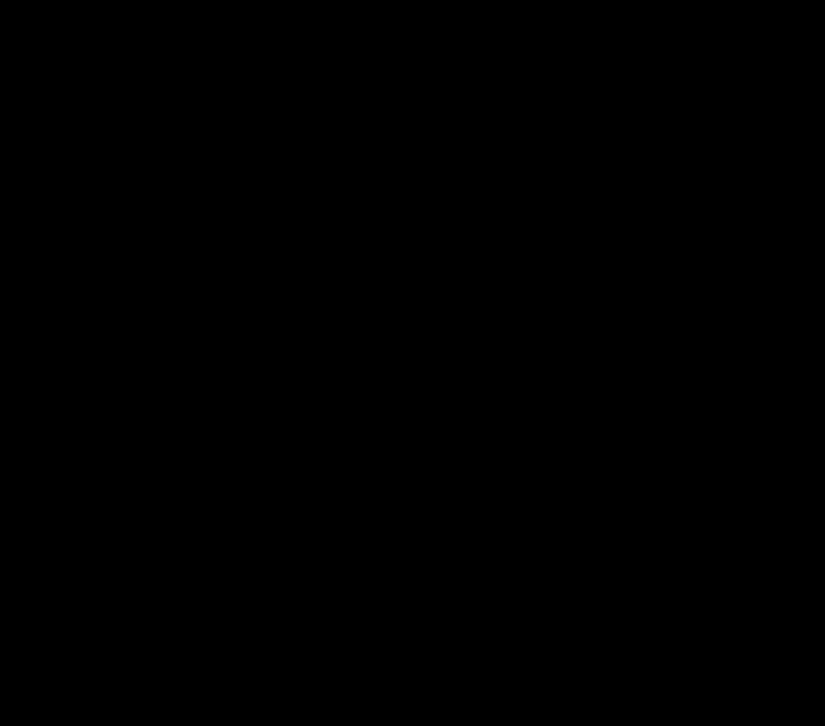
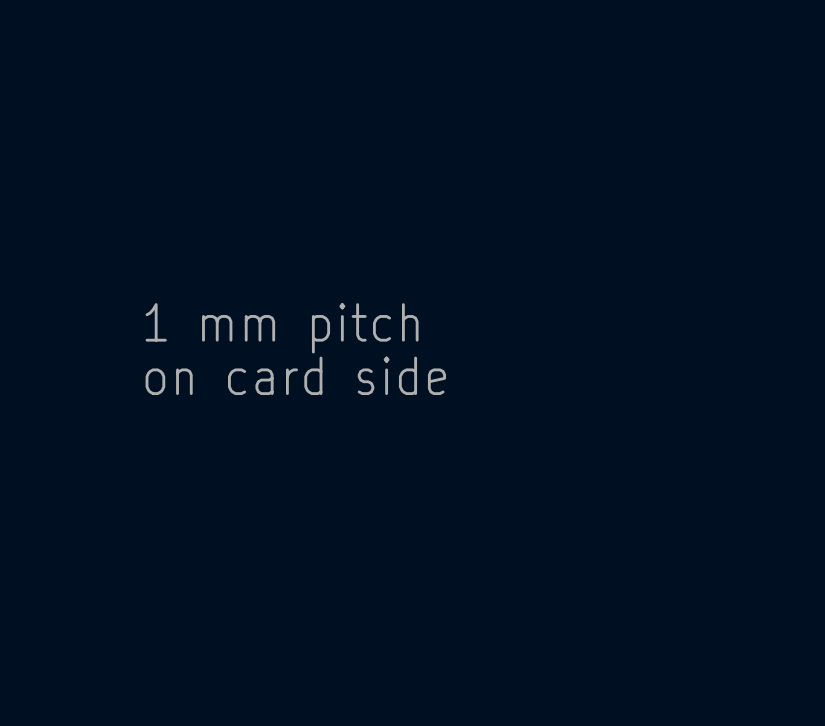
text: none -> 1 mm pitch (282, 328)
text: none -> on card side (295, 375)

